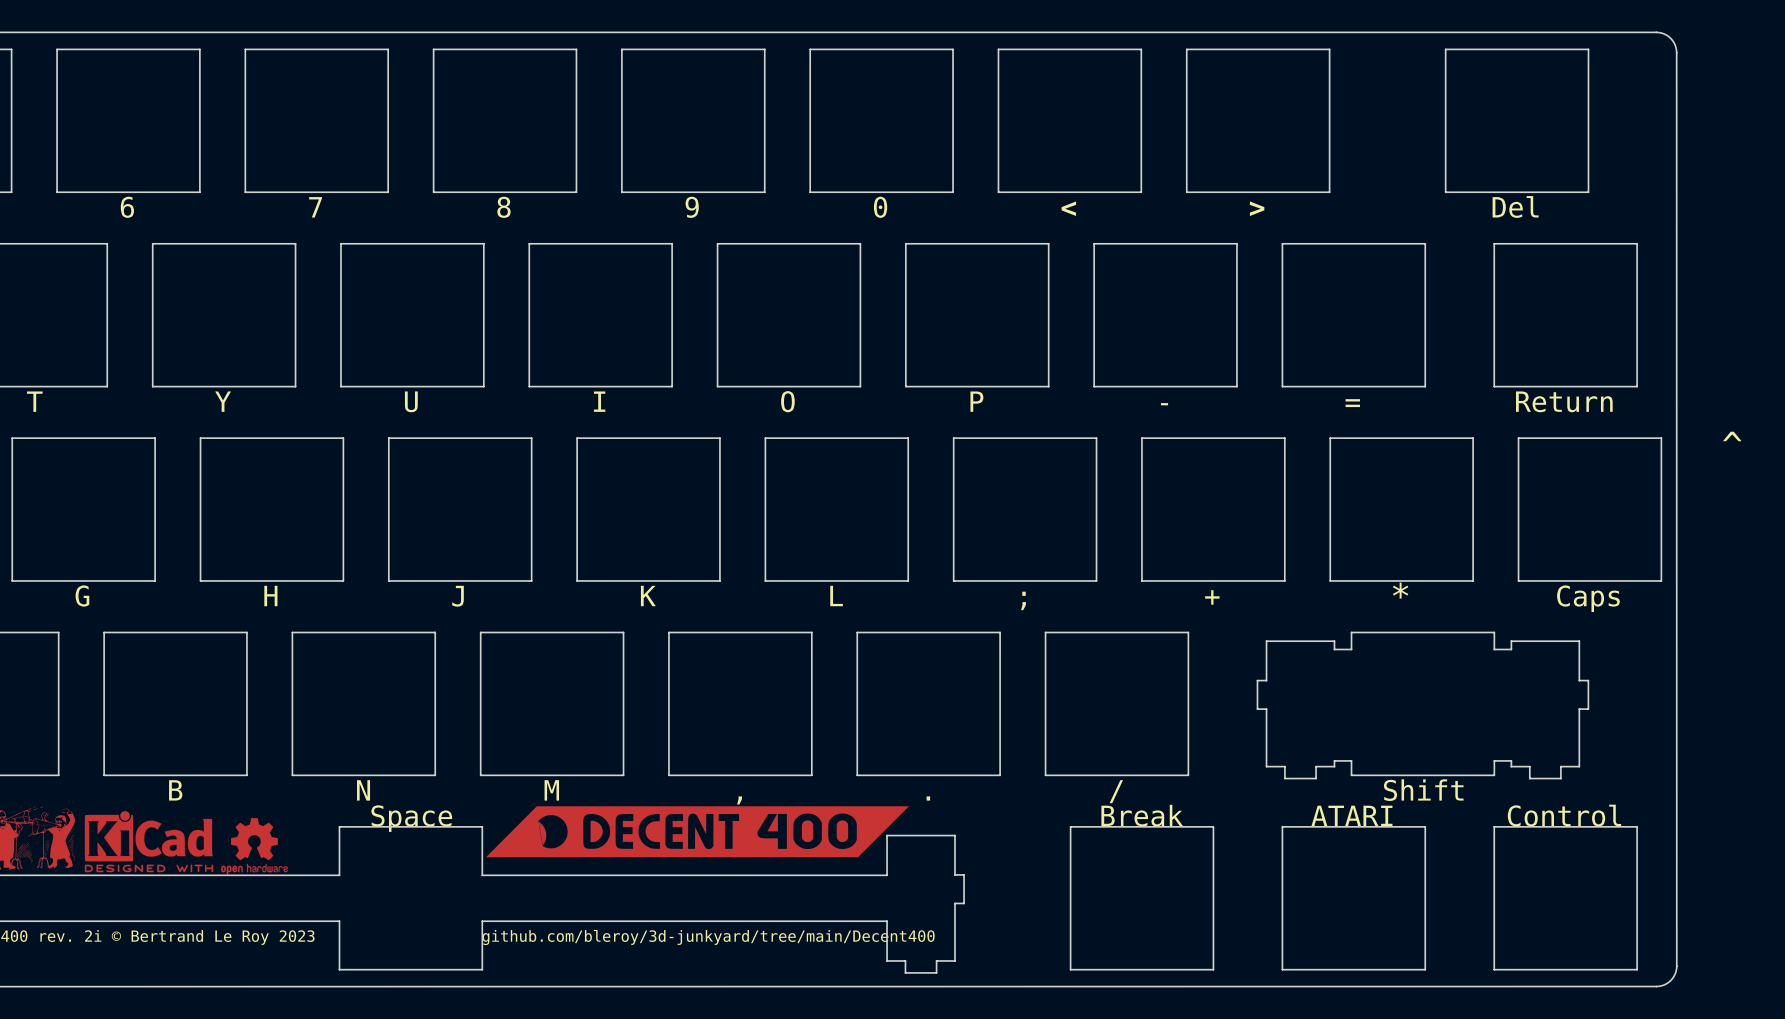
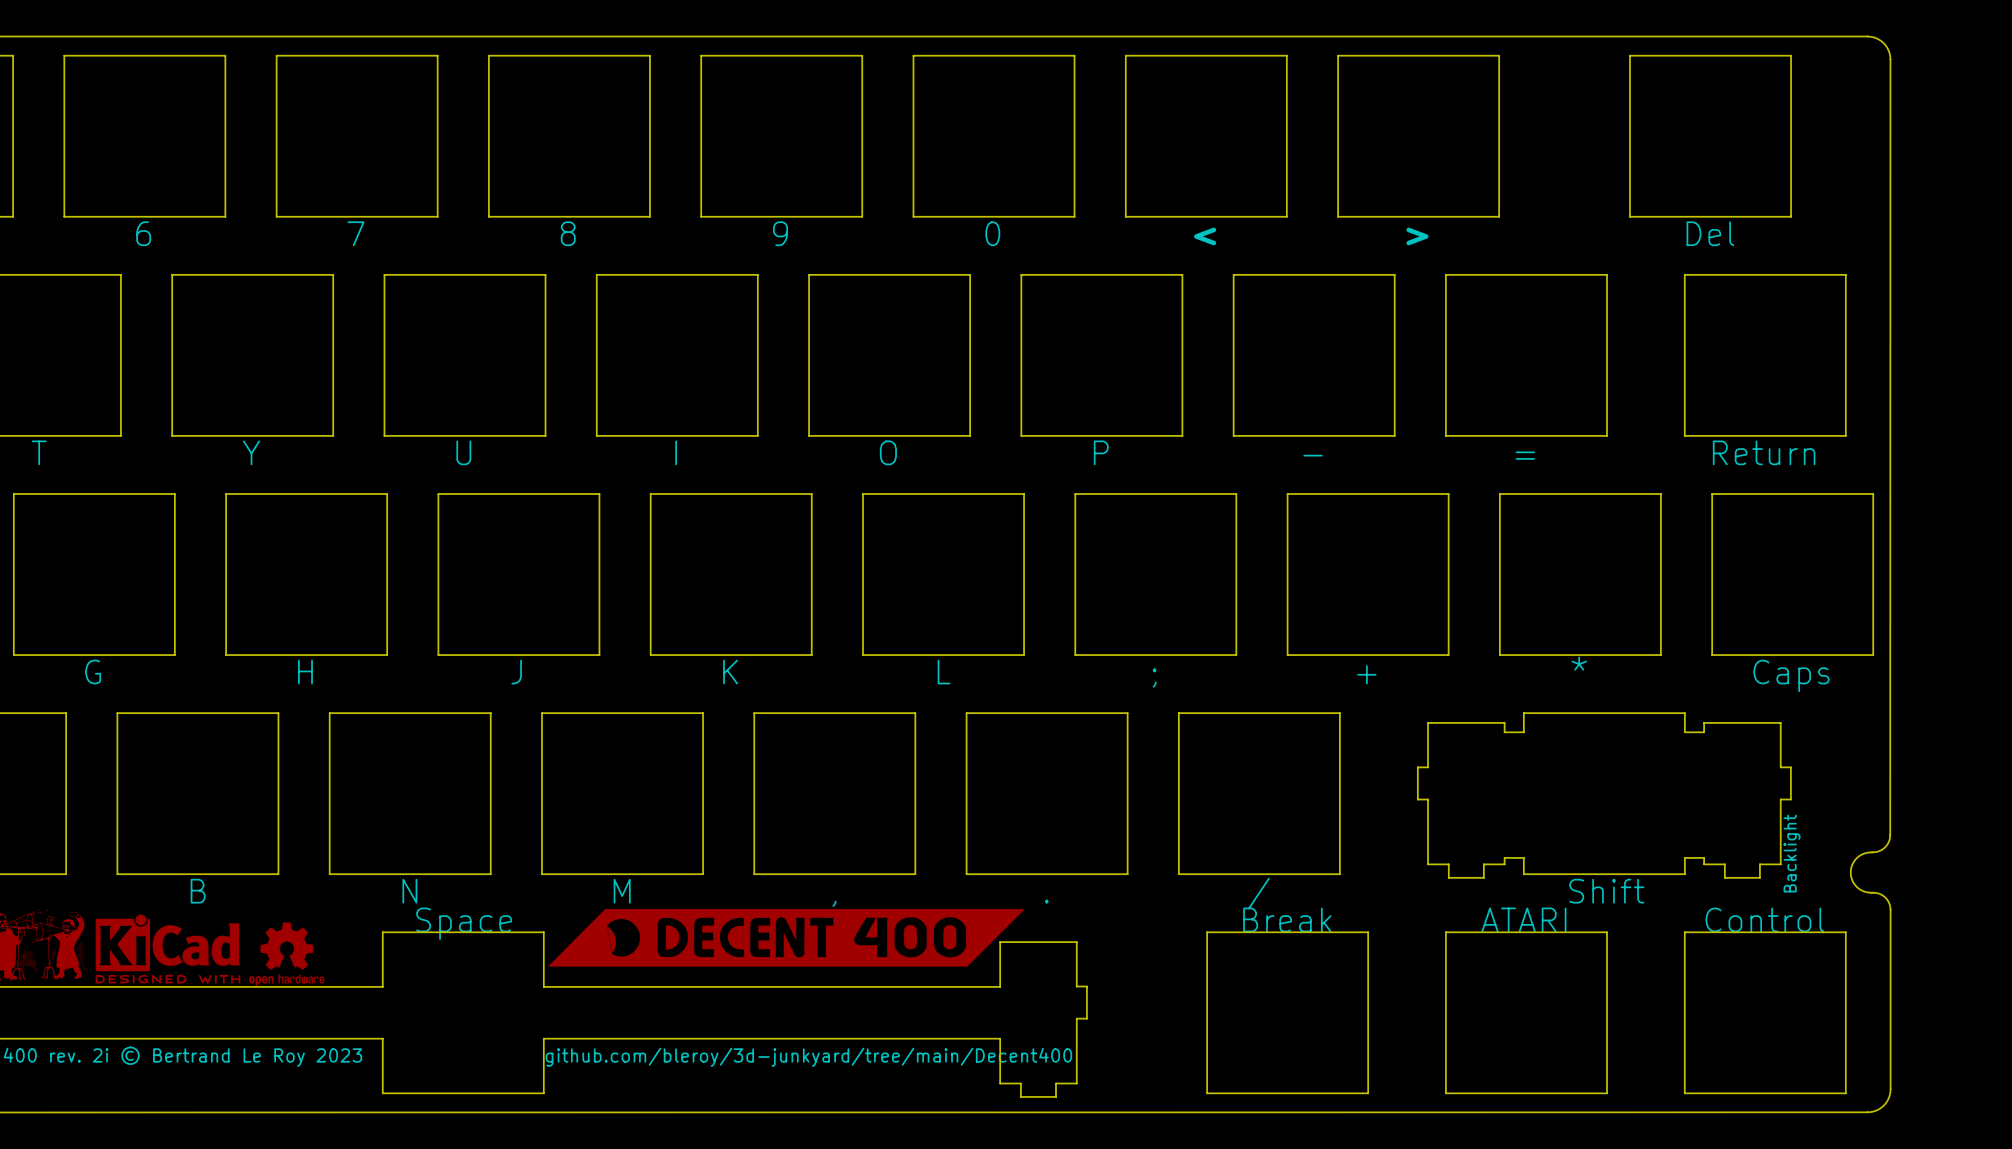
board edge: (1676, 52) (1676, 966) -> (1890, 59) (1890, 835) (1888, 841) (1883, 848) (1863, 853) (1856, 858) (1852, 864) (1850, 872) (1852, 880) (1856, 886) (1865, 892) (1881, 895) (1888, 901) (1890, 907) (1890, 1089)
text: ^ (1732, 436) -> none
text: none -> Backlight (1792, 853)

